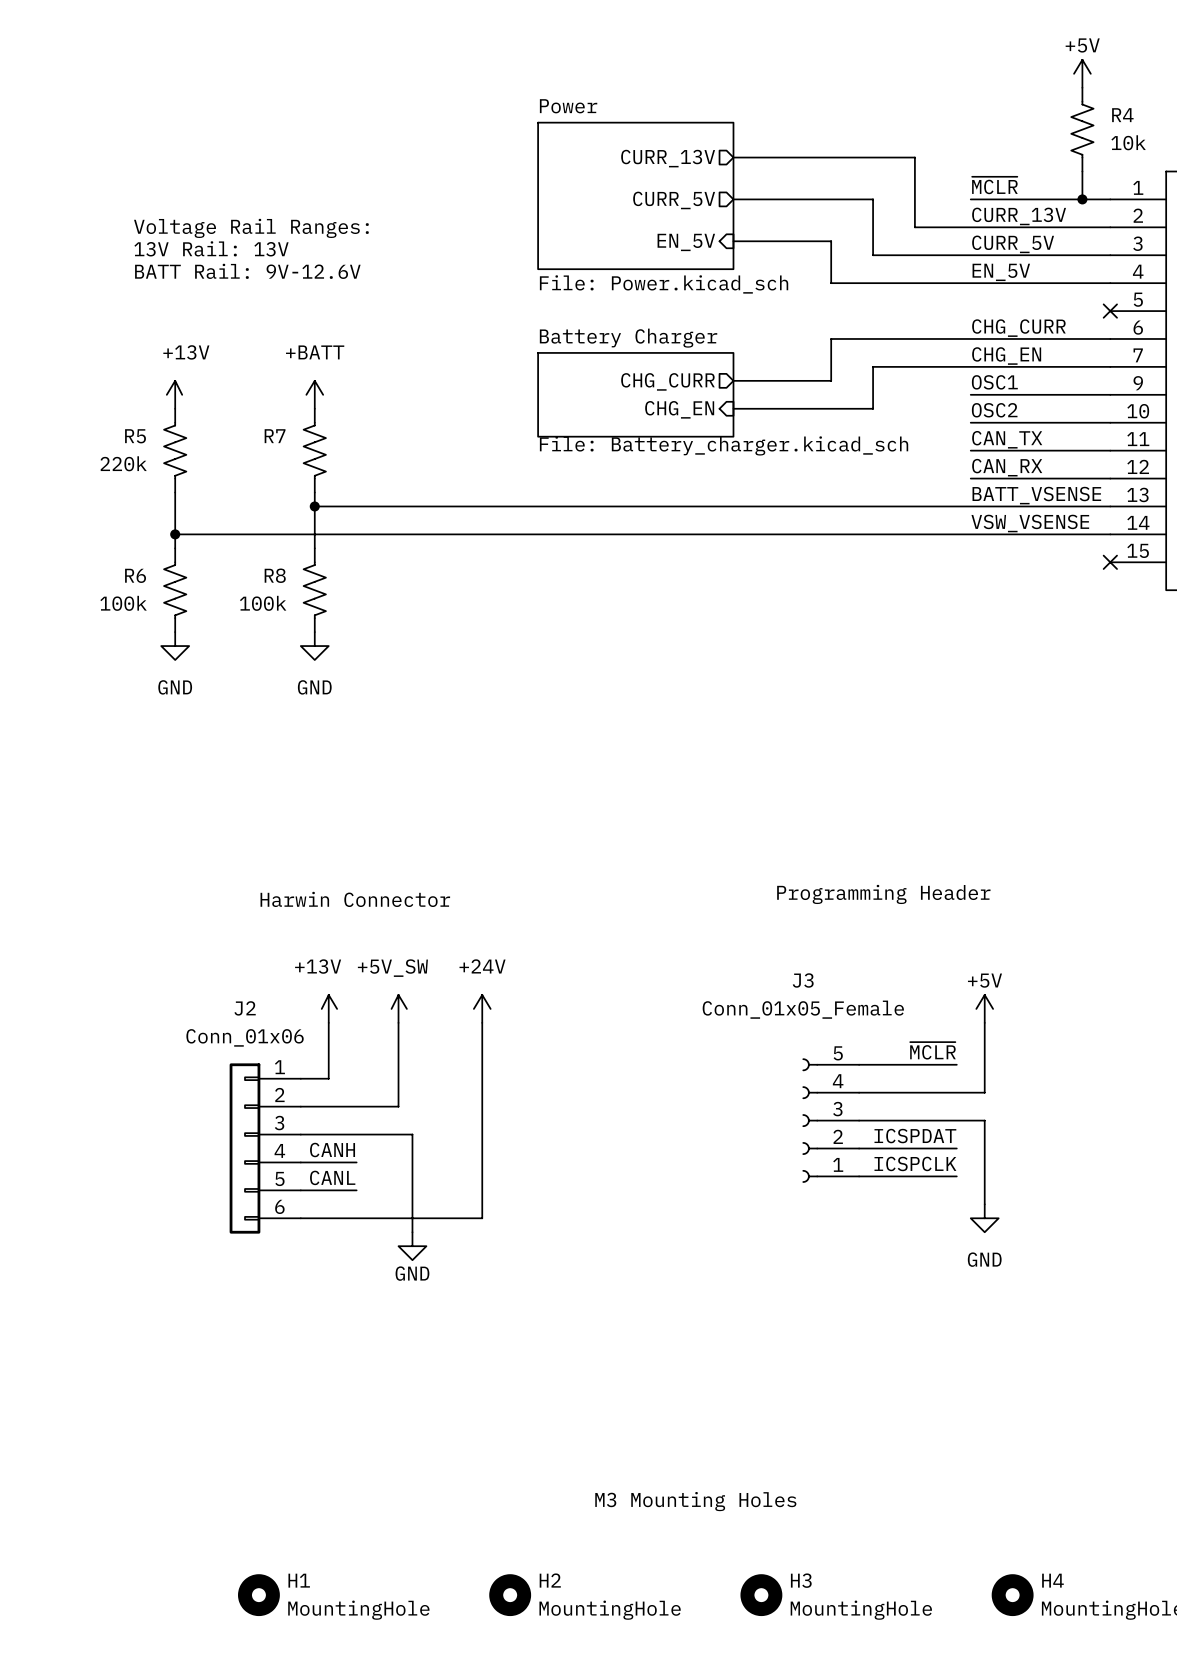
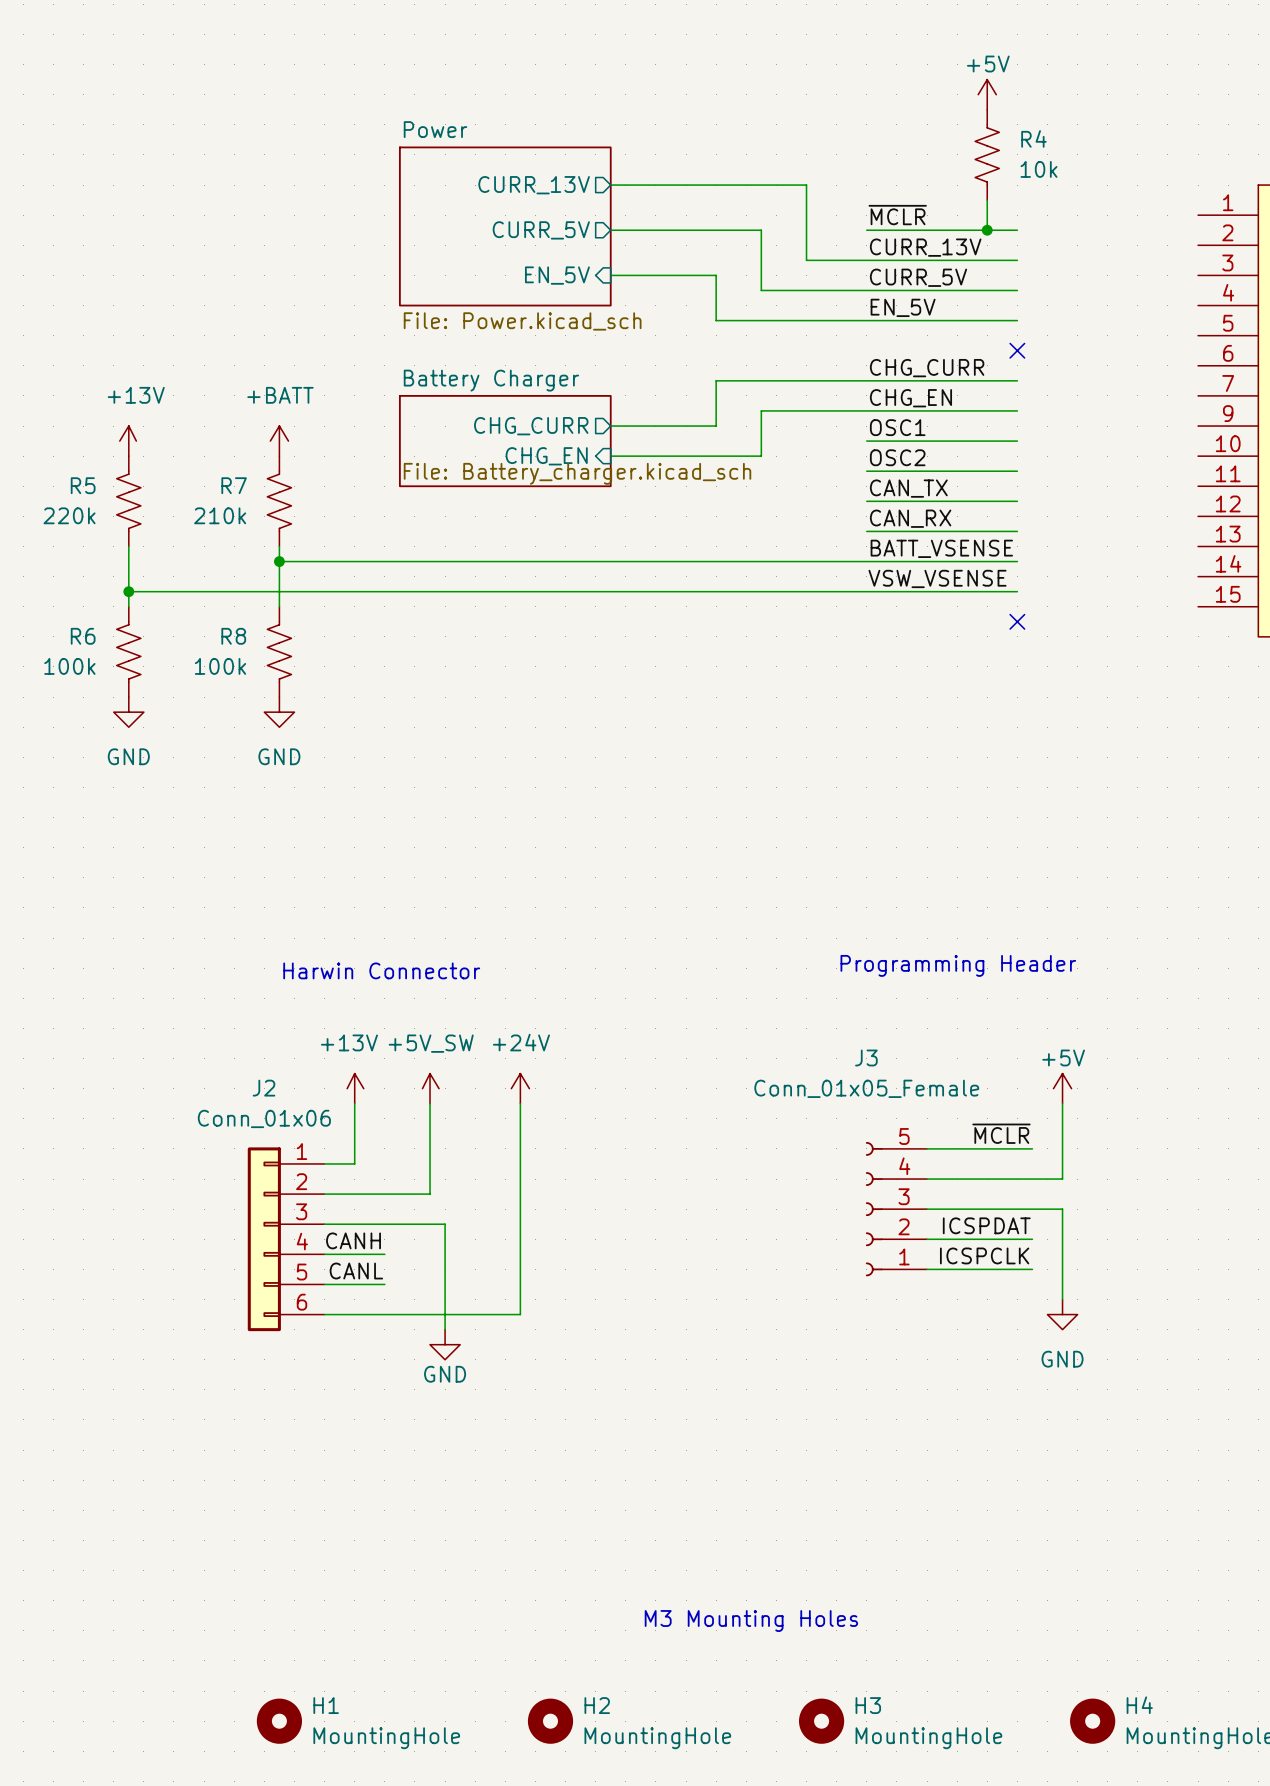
power symbol: +5V (1082, 73) -> none
power symbol: none -> +5V (987, 94)
R4 position: (1082, 129) -> (987, 154)
wire: (733, 157) (914, 157) (914, 185) -> none
sheet pin position: CURR_13V (668, 158) -> CURR_13V (534, 185)
wire: (1082, 171) (1082, 199) -> none
label position: ~{MCLR} (994, 185) -> ~{MCLR} (897, 215)
sheet Power position: (635, 195) -> (505, 226)
wire: (733, 199) (873, 199) (873, 255) (1110, 255) -> (610, 230) (761, 230) (761, 290) (1017, 290)
wire: (970, 199) (1110, 199) -> (866, 230) (1017, 230)
junction: (1082, 199) -> none
sheet pin position: CURR_5V (674, 200) -> CURR_5V (541, 230)
wire: (914, 213) (914, 227) (1110, 227) -> none
junction: none -> (987, 230)
label position: CURR_13V (1019, 216) -> CURR_13V (925, 247)
text: Voltage Rail Ranges: (251, 228) -> none
wire: (733, 241) (747, 241) -> (610, 185) (806, 185) (806, 260)
wire: (831, 241) (831, 283) (1110, 283) -> (896, 260) (1017, 260)
sheet pin position: EN_5V (686, 242) -> EN_5V (557, 275)
label position: CURR_5V (1013, 244) -> CURR_5V (918, 277)
text: 13V Rail: 13V (211, 248) -> none
wire: none -> (610, 275) (716, 275) (716, 320) (1017, 320)
text: BATT Rail: 9V-12.6V (247, 271) -> none
label position: EN_5V (1001, 272) -> EN_5V (903, 307)
no-connect mark: (1110, 311) -> none
no-connect mark: none -> (1017, 350)
label position: CHG_CURR (1018, 328) -> CHG_CURR (927, 368)
wire: (1110, 338) (831, 338) (831, 380) -> (1017, 410) (896, 410)
wire: none -> (1017, 380) (716, 380) (716, 426) (610, 426)
label position: CHG_EN (1006, 356) -> CHG_EN (910, 398)
wire: (1110, 366) (873, 366) (873, 408) -> (1017, 441) (942, 441)
wire: none -> (791, 410) (761, 410) (761, 456) (610, 456)
sheet pin position: CHG_CURR (667, 381) -> CHG_CURR (531, 426)
label position: OSC1 (994, 382) -> OSC1 (897, 427)
power symbol position: +13V (174, 394) -> +13V (128, 441)
power symbol position: +BATT (314, 394) -> +BATT (279, 441)
sheet Battery Charger position: (635, 394) -> (505, 441)
wire: (970, 394) (1110, 394) -> none
wire: (733, 408) (803, 408) -> none
sheet pin position: CHG_EN (679, 409) -> CHG_EN (546, 456)
label position: OSC2 (994, 410) -> OSC2 (897, 457)
wire: (970, 422) (1110, 422) -> (866, 471) (1017, 471)
label position: CAN_TX (1007, 439) -> CAN_TX (908, 488)
sheet Battery Charger value position: File: Battery_charger.kicad_sch (724, 445) -> File: Battery_charger.kicad_sch (577, 473)
R5 position: (175, 450) -> (128, 501)
R7 position: (314, 450) -> (279, 501)
wire: (970, 450) (1110, 450) -> (866, 501) (1017, 501)
label position: CAN_RX (1007, 467) -> CAN_RX (910, 518)
R7 value: none -> 210k (220, 515)
wire: (970, 478) (1110, 478) -> (866, 531) (1017, 531)
wire: (175, 492) (175, 548) -> (128, 546) (128, 606)
wire: (314, 492) (314, 548) -> (279, 546) (279, 606)
label position: BATT_VSENSE (1036, 495) -> BATT_VSENSE (941, 548)
wire: (314, 506) (1110, 506) -> none
junction: (314, 506) -> none
wire: none -> (279, 561) (1017, 561)
junction: none -> (279, 561)
label position: VSW_VSENSE (1030, 523) -> VSW_VSENSE (937, 578)
wire: (175, 534) (1110, 534) -> none
junction: (175, 534) -> none
wire: none -> (128, 591) (1017, 591)
junction: none -> (128, 591)
no-connect mark: (1110, 562) -> none
no-connect mark: none -> (1017, 621)
R6 position: (175, 590) -> (128, 651)
R8 position: (314, 590) -> (279, 651)
power symbol: GND (175, 646) -> none
power symbol: GND (314, 646) -> none
power symbol: none -> GND (128, 712)
power symbol: none -> GND (279, 712)

